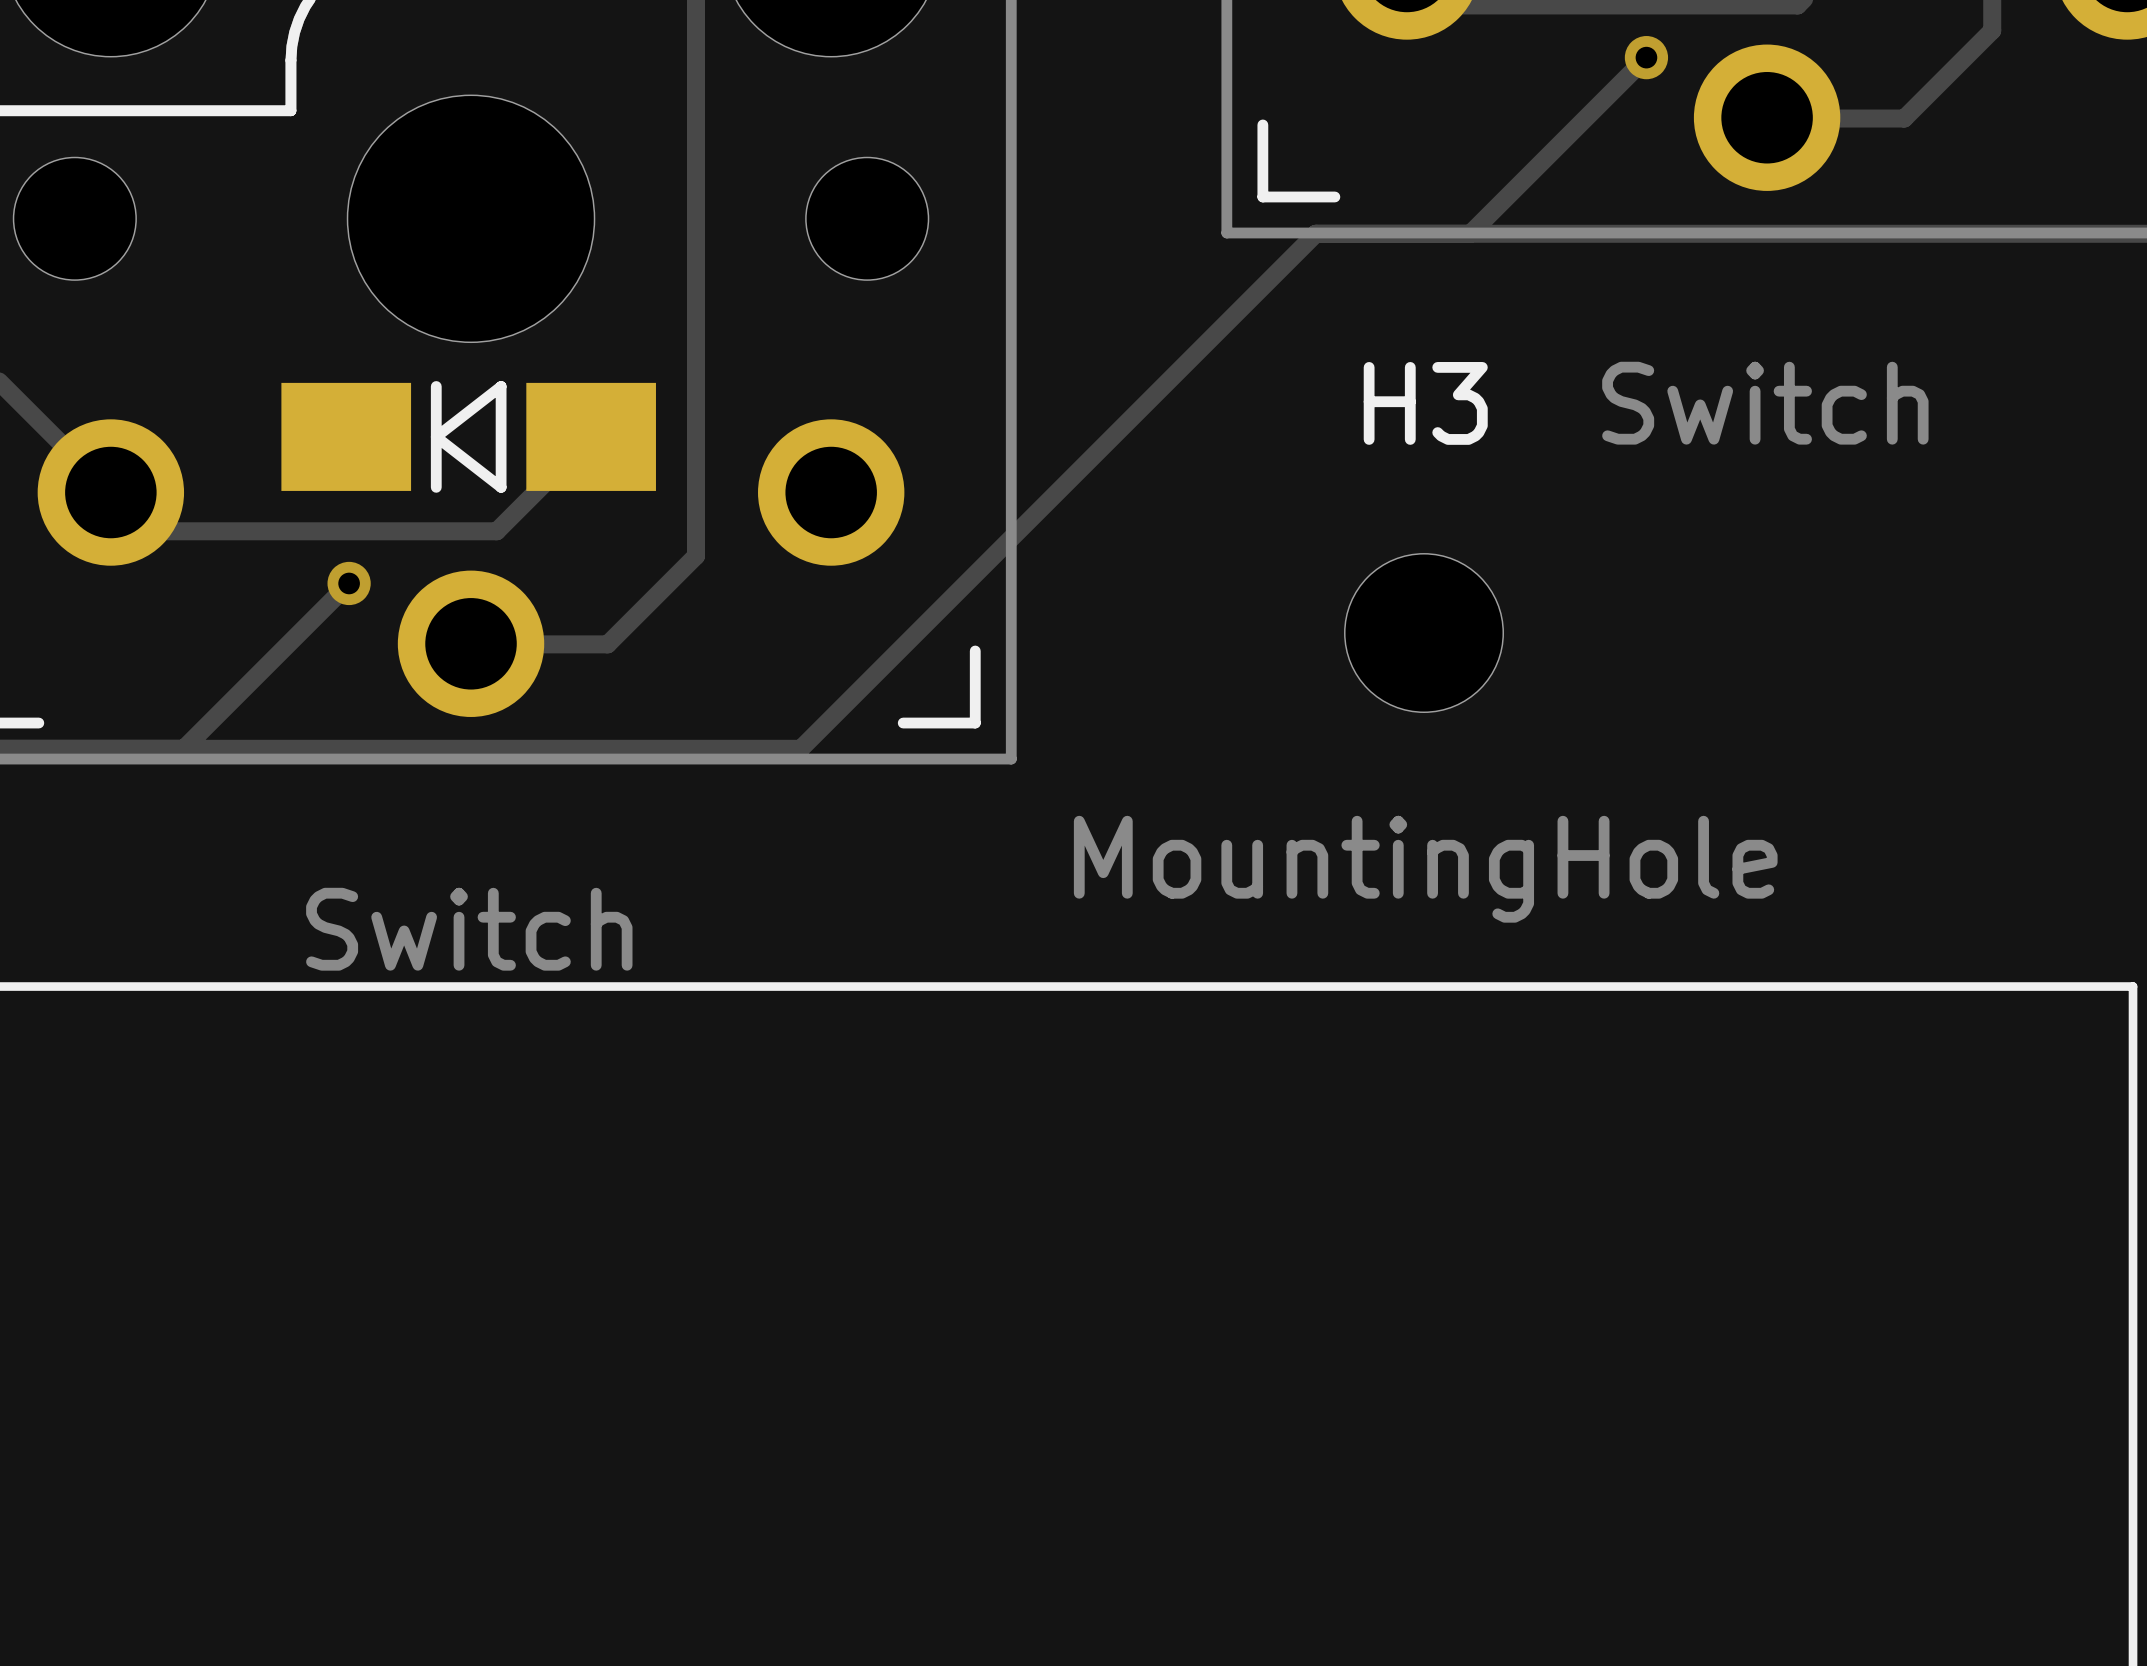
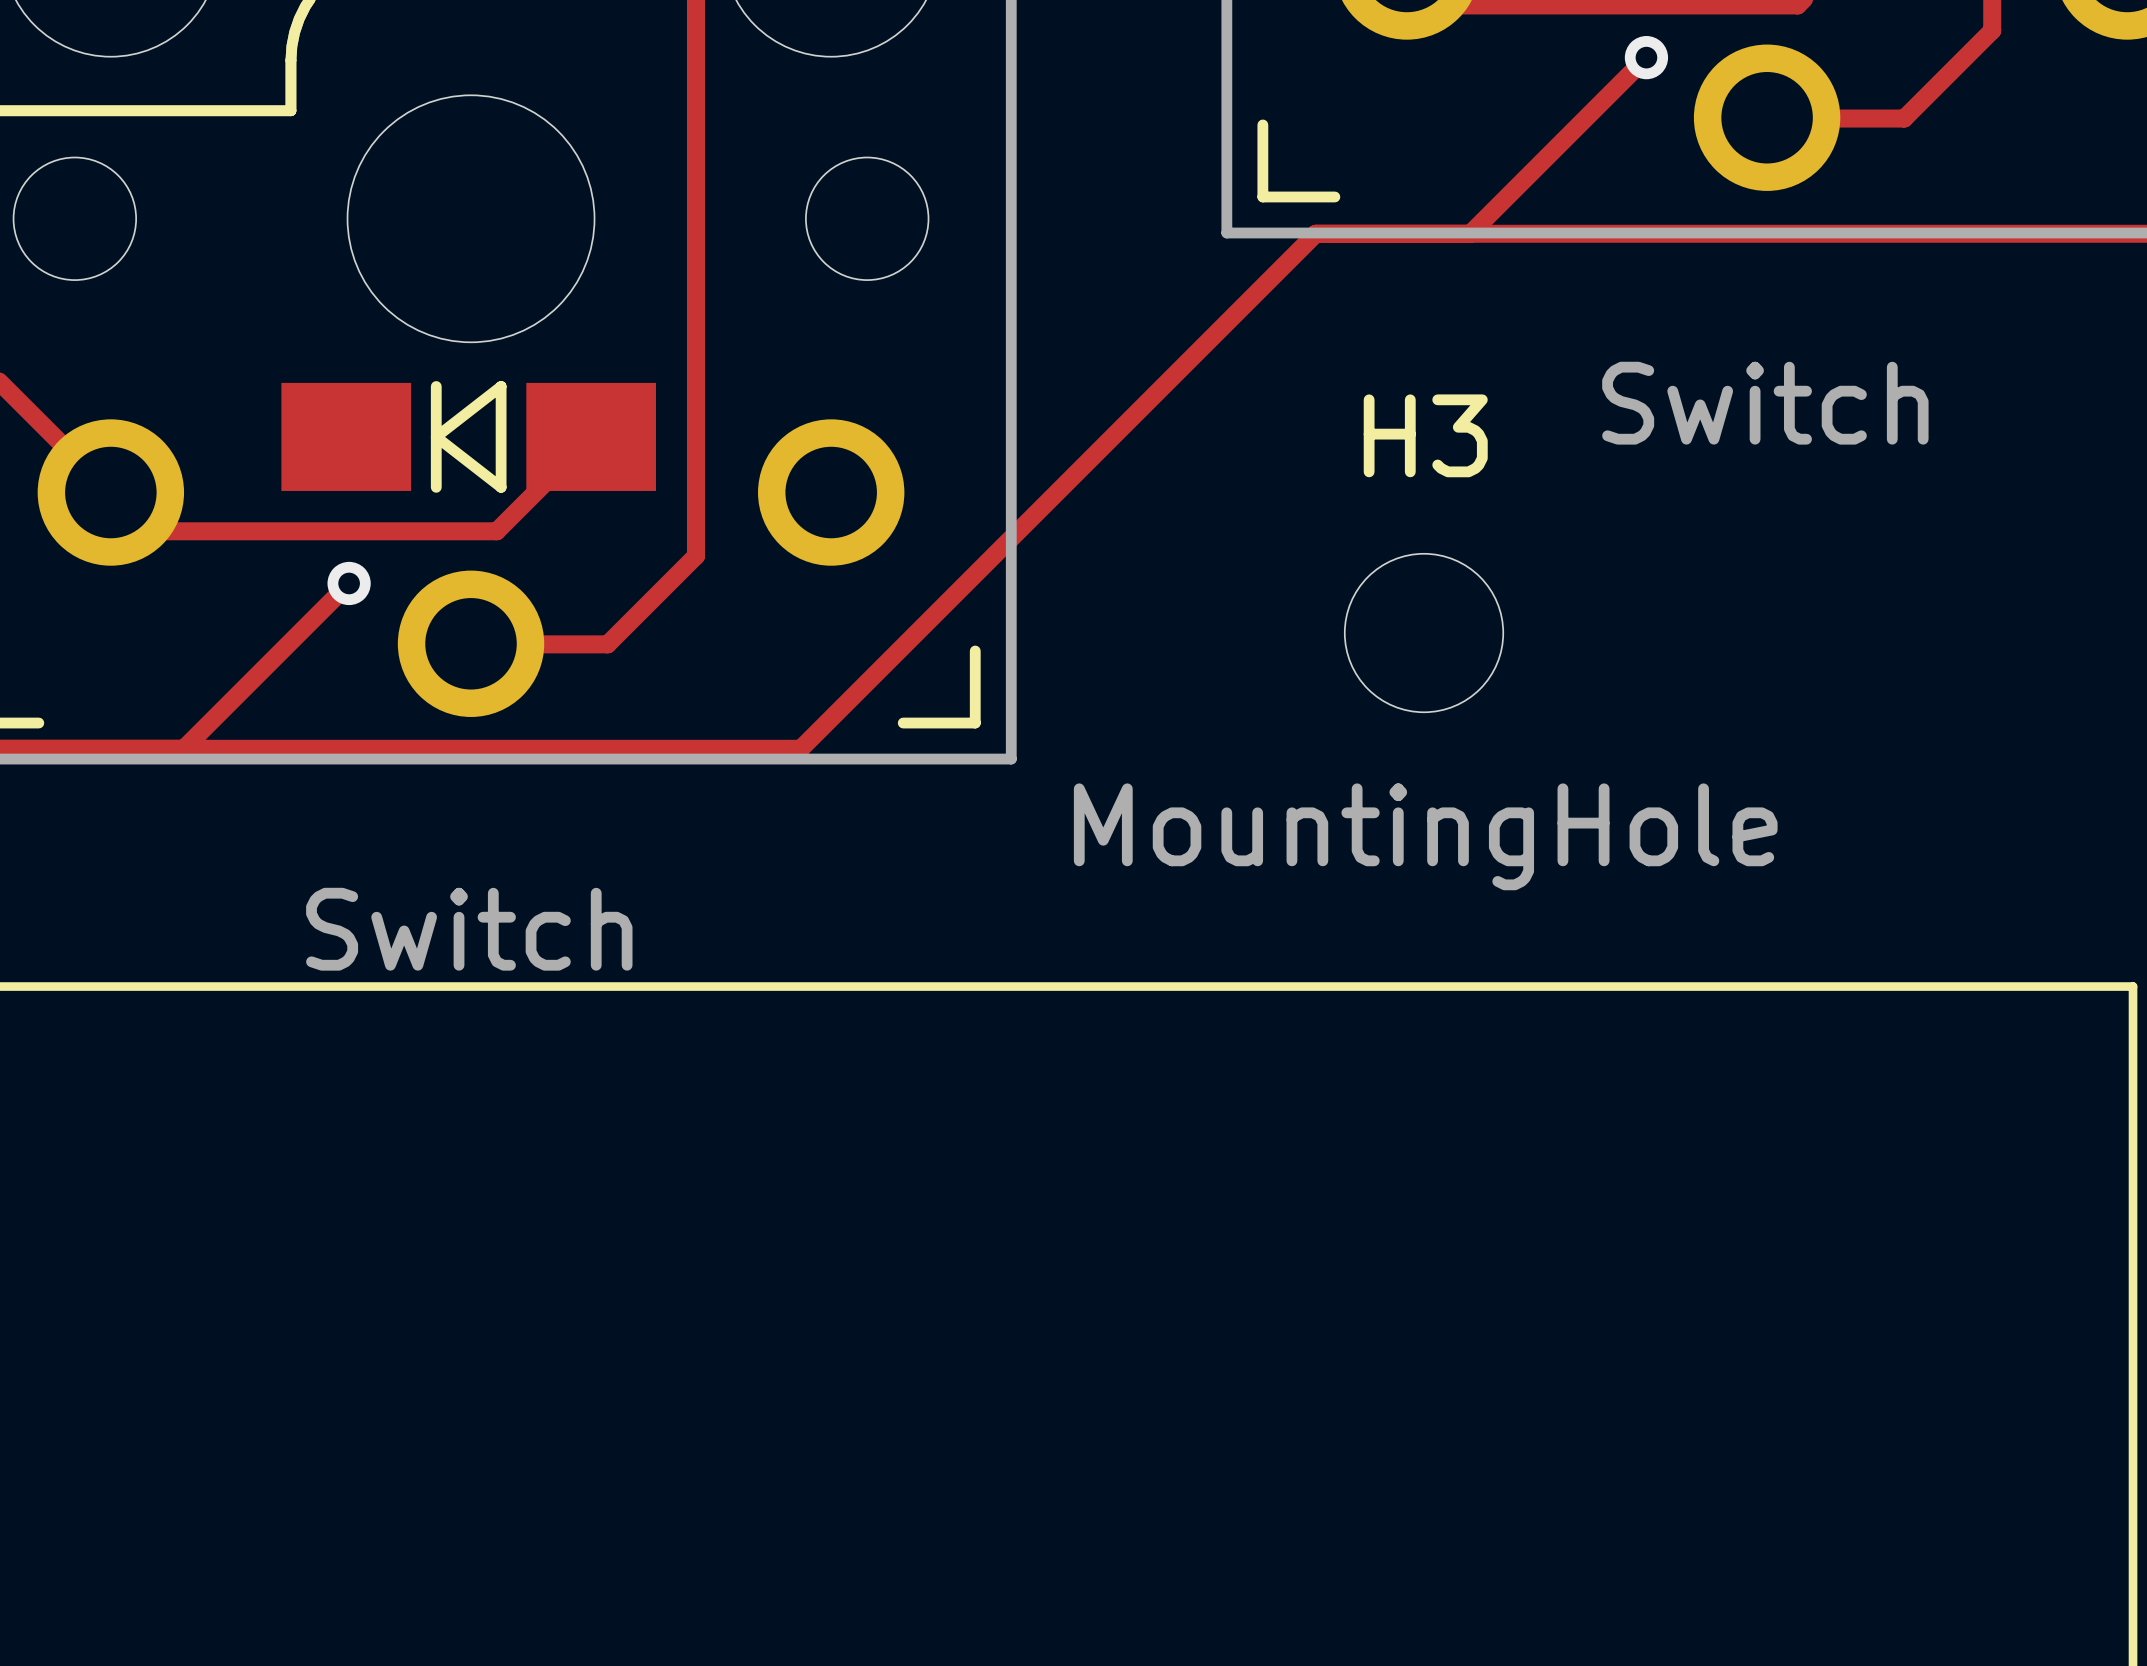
H3 name position: H3 (1425, 403) -> H3 (1425, 435)
H3 value position: MountingHole (1425, 869) -> MountingHole (1425, 836)

